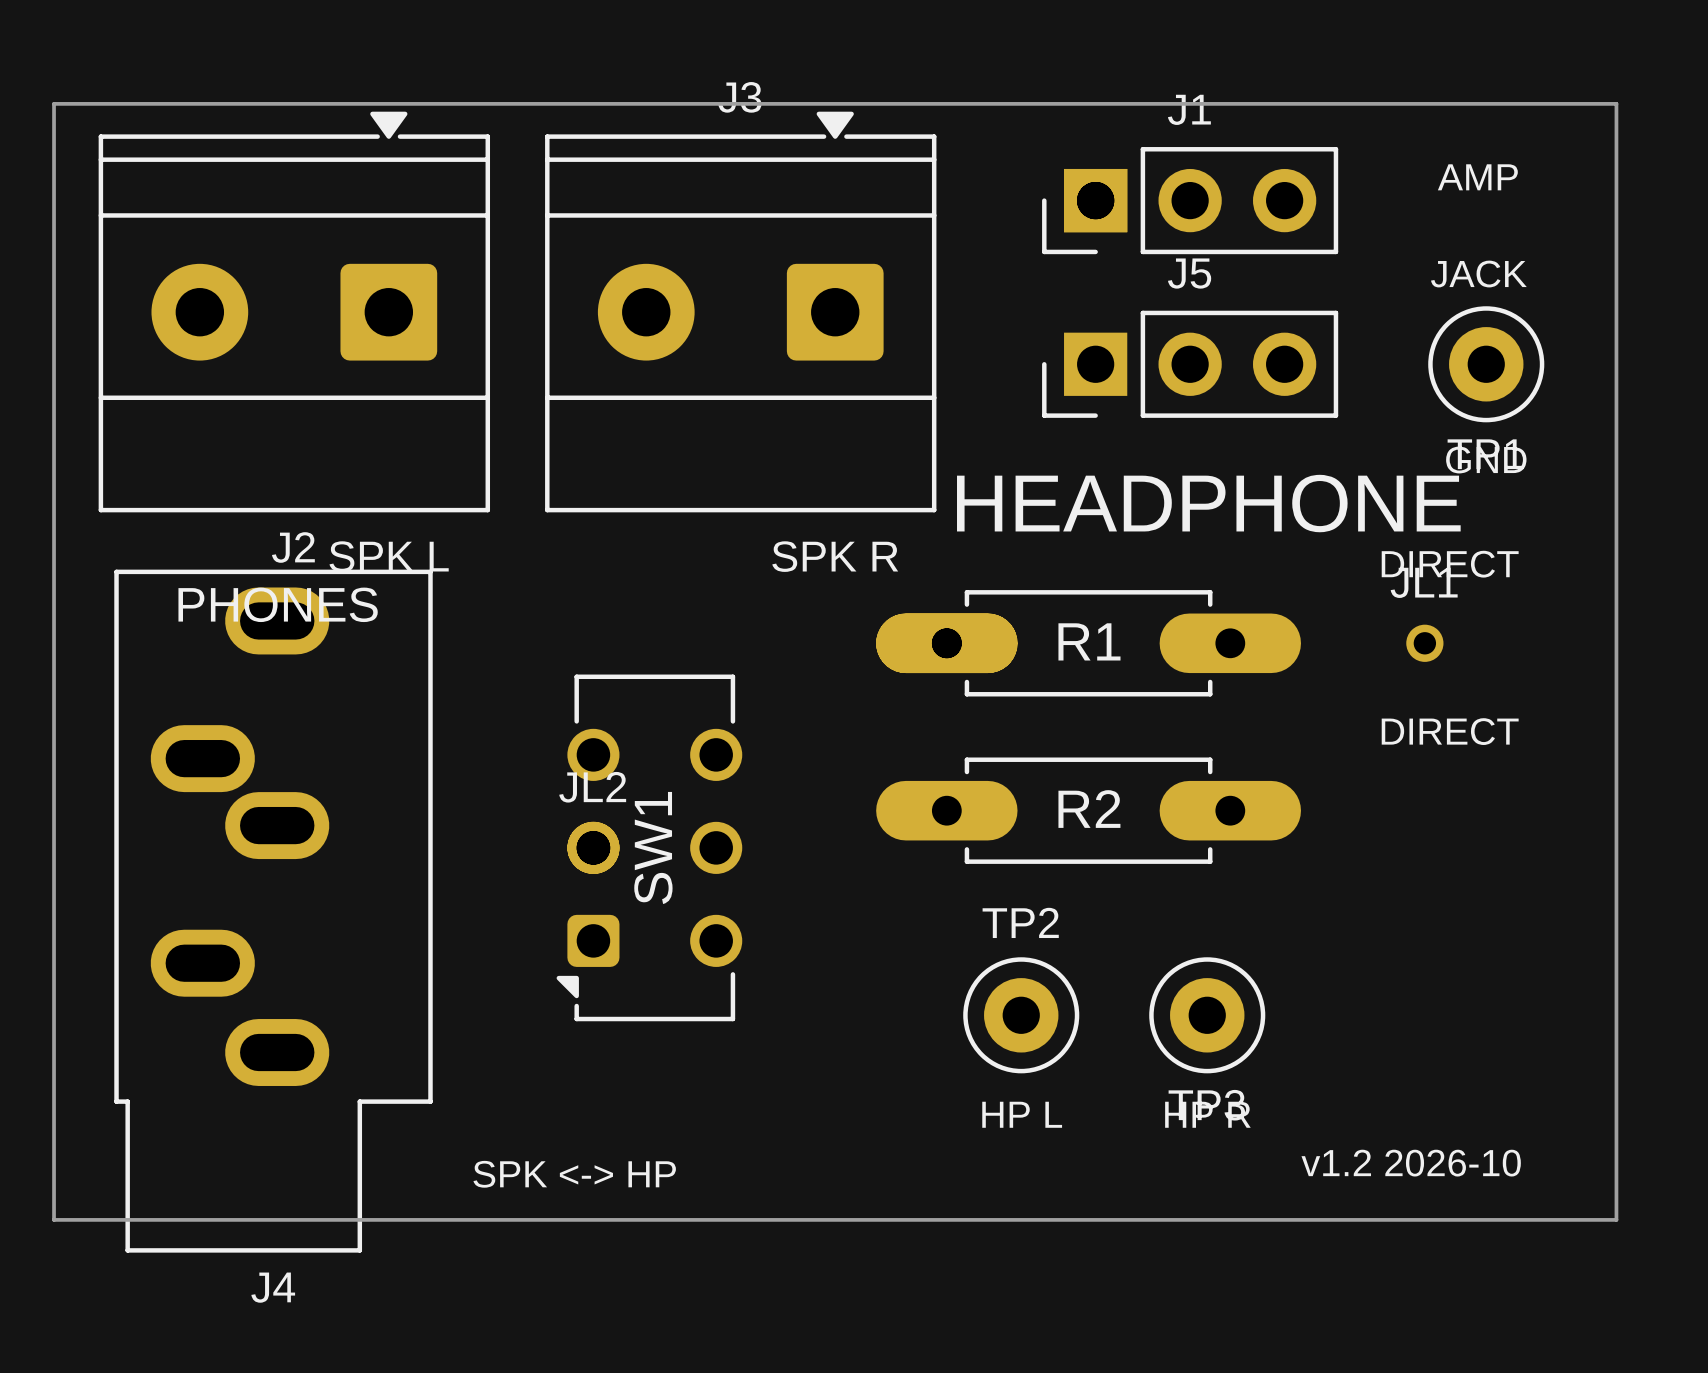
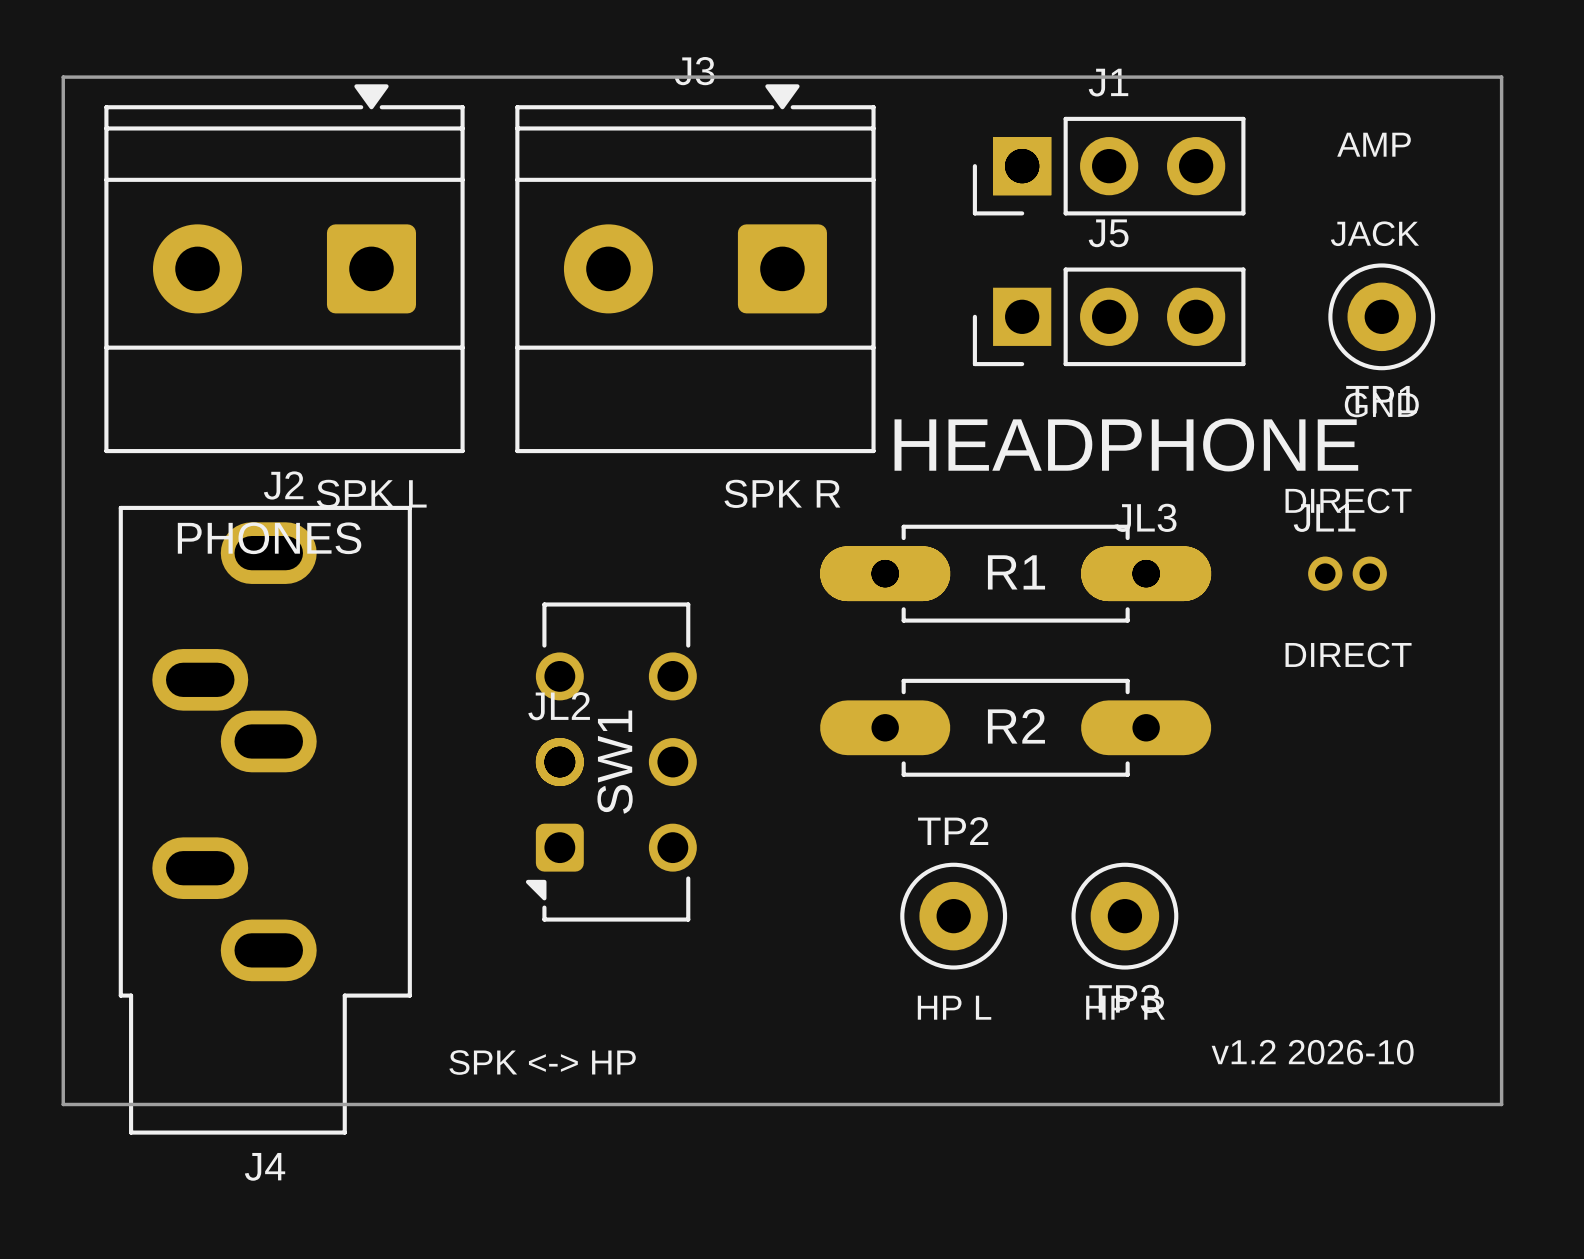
JL3: none -> (1233, 573)

